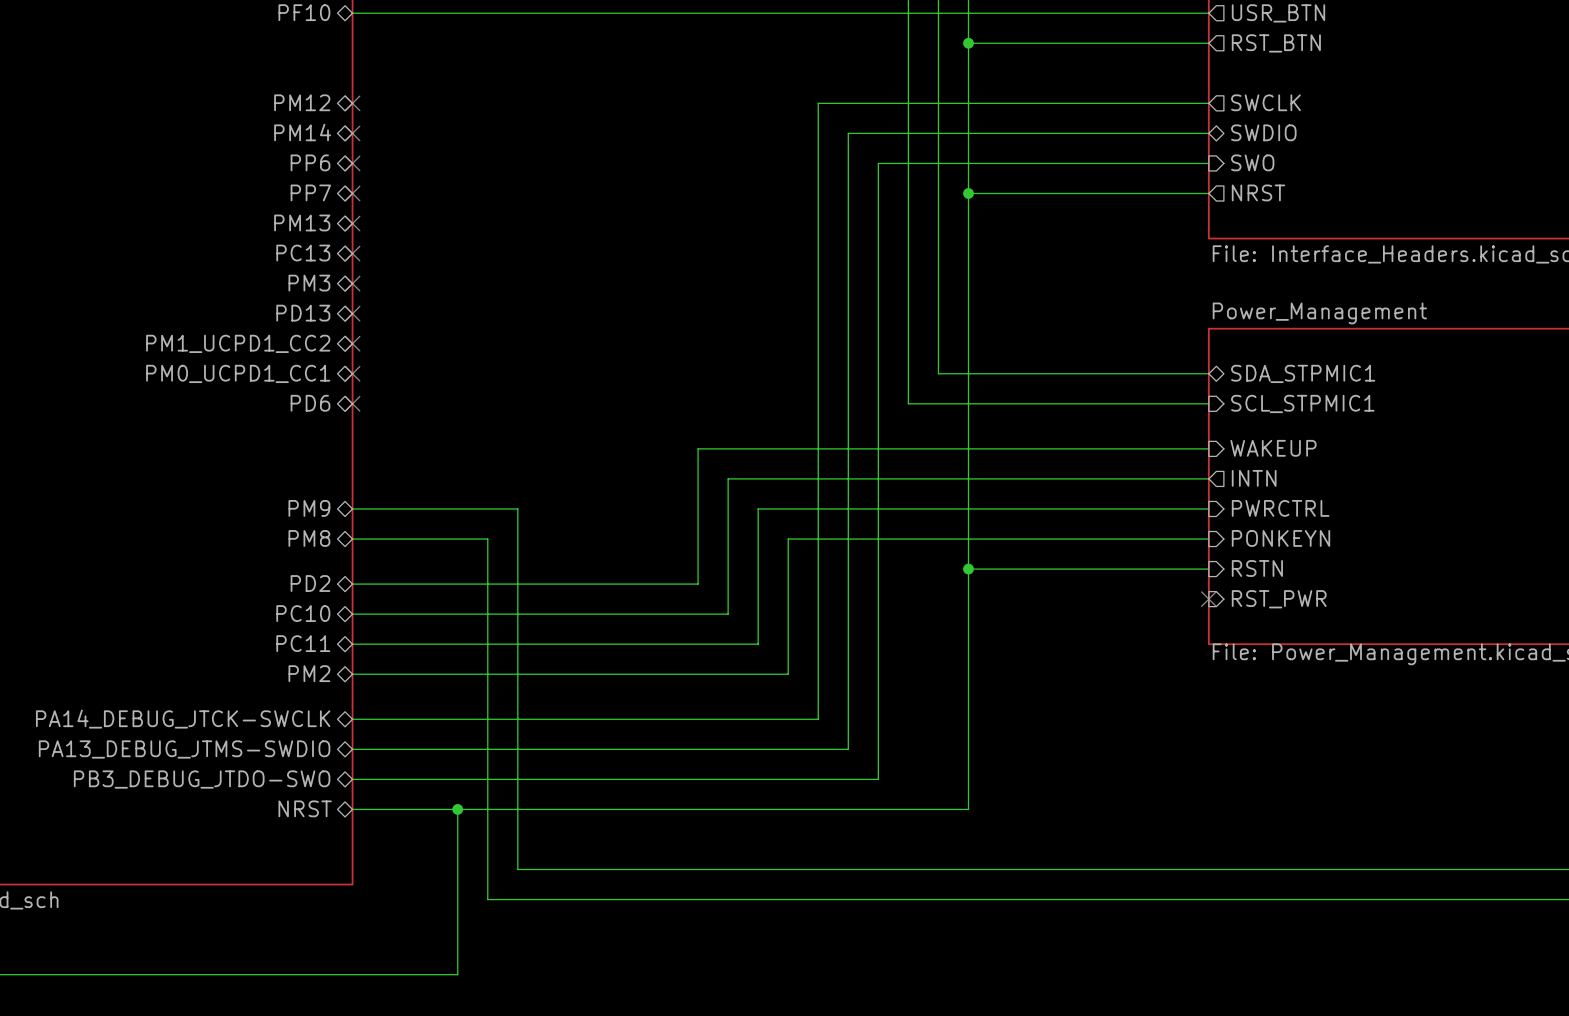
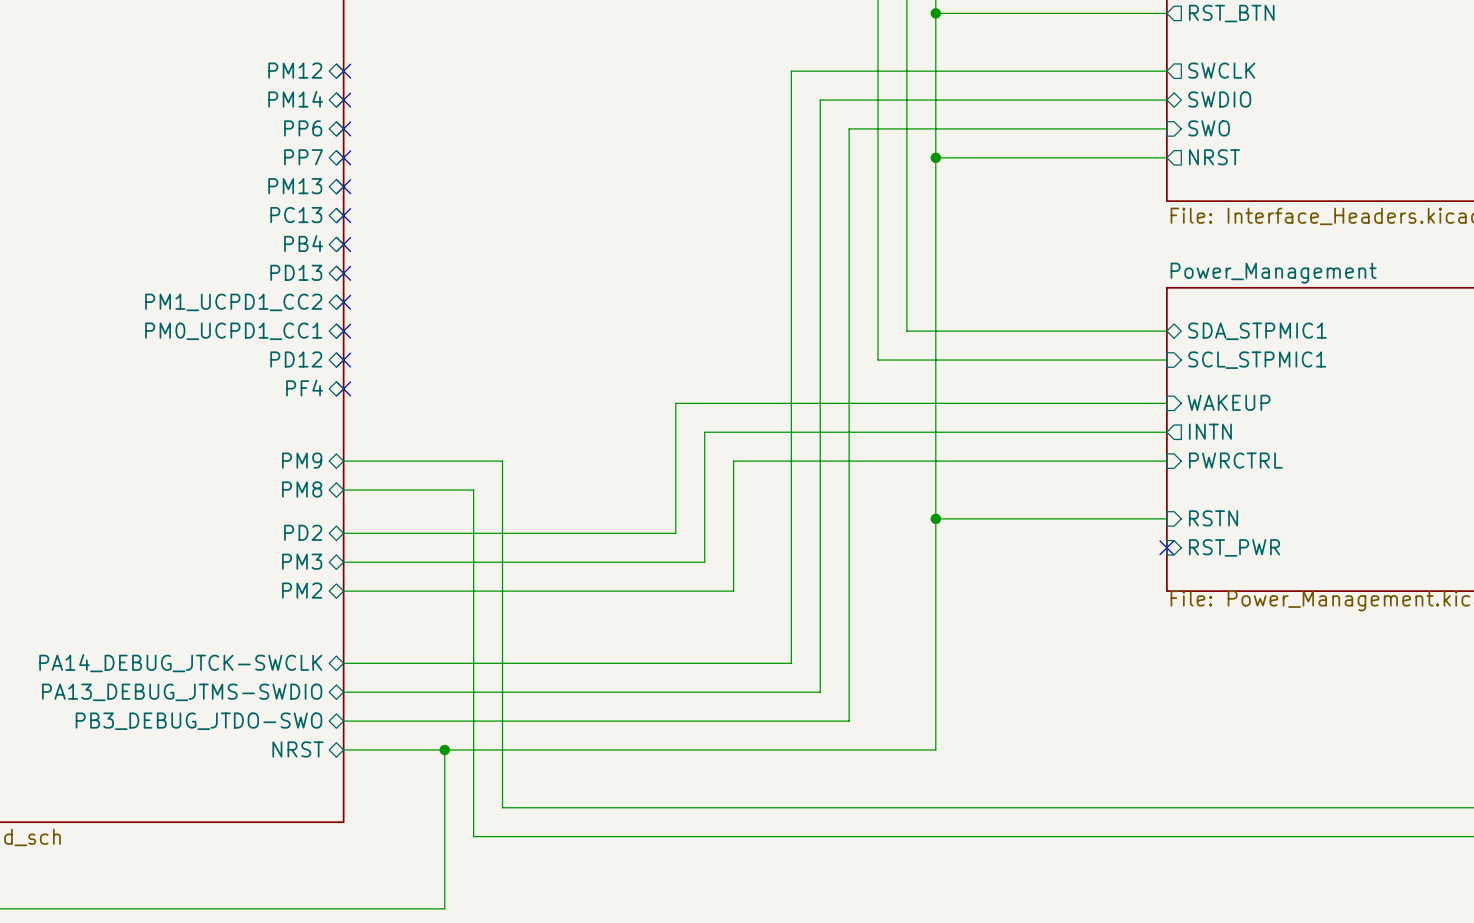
sheet pin: PM3 (309, 283) -> PB4 (303, 243)
sheet pin: PD6 (310, 403) -> PD12 (296, 359)
sheet pin: none -> PF4 (304, 388)
no-connect mark: none -> (343, 388)
sheet pin: PONKEYN (1280, 538) -> none
wire: (1208, 539) (788, 539) (788, 674) (352, 674) -> none
sheet pin: PC10 (303, 613) -> PM3 (302, 561)
sheet pin: PC11 (303, 643) -> PM2 (302, 590)
sheet pin: PM2 (309, 673) -> none

